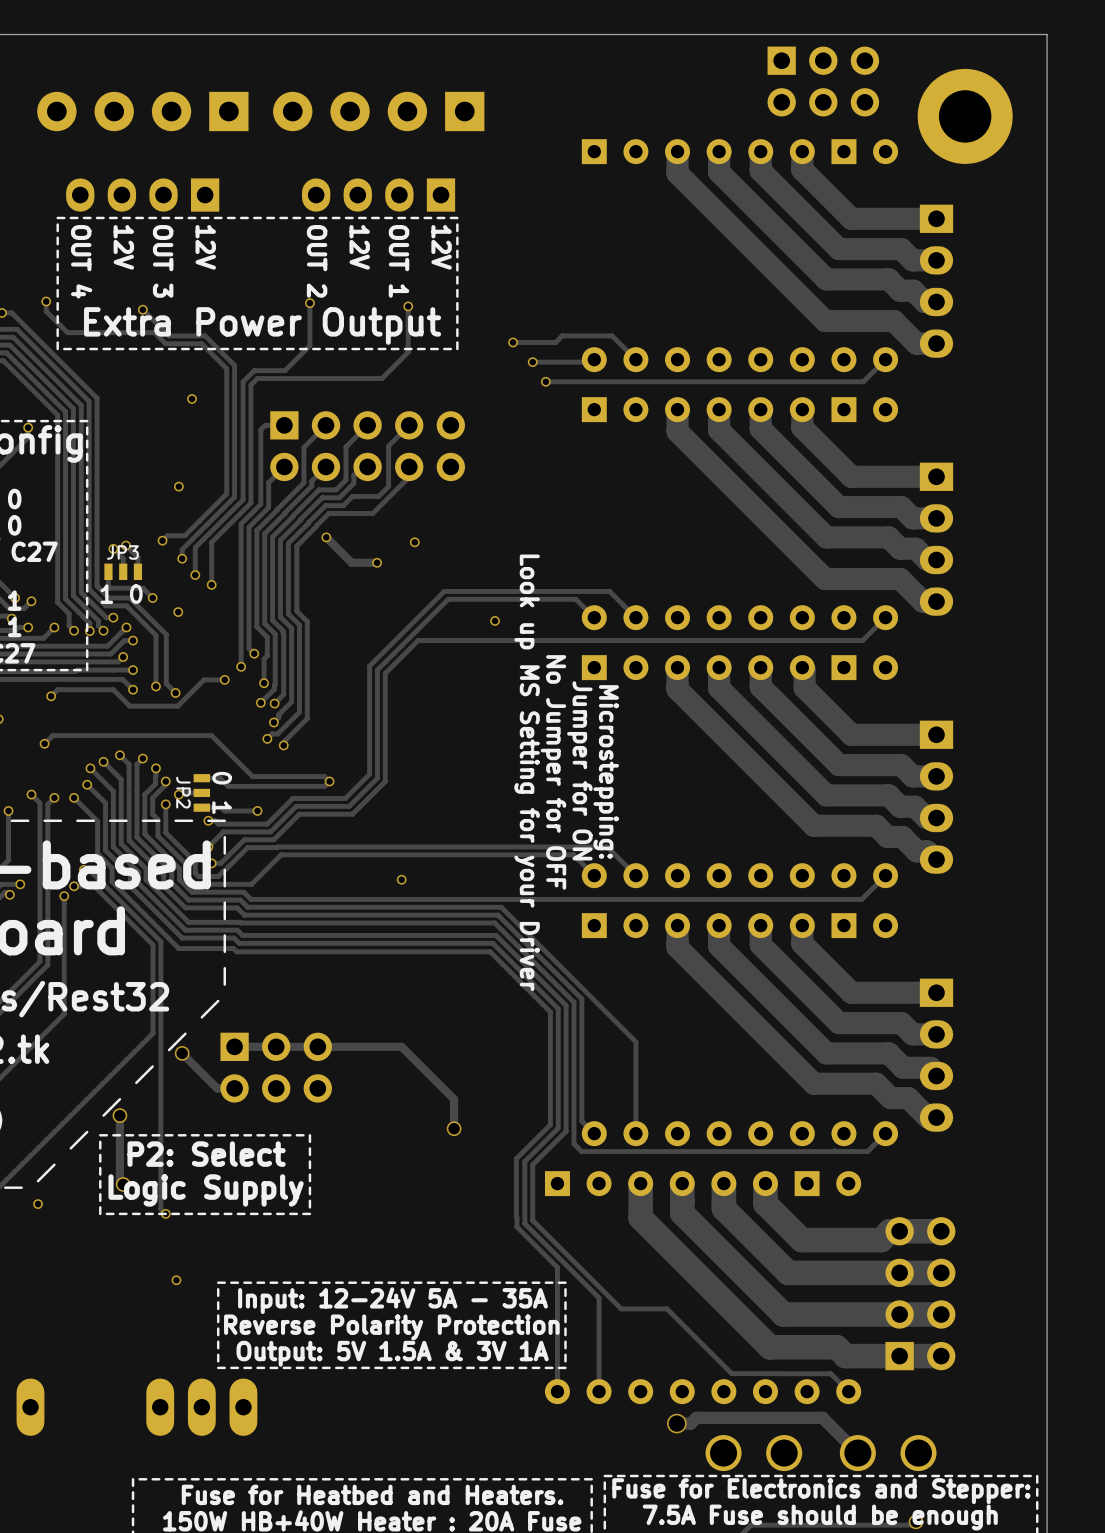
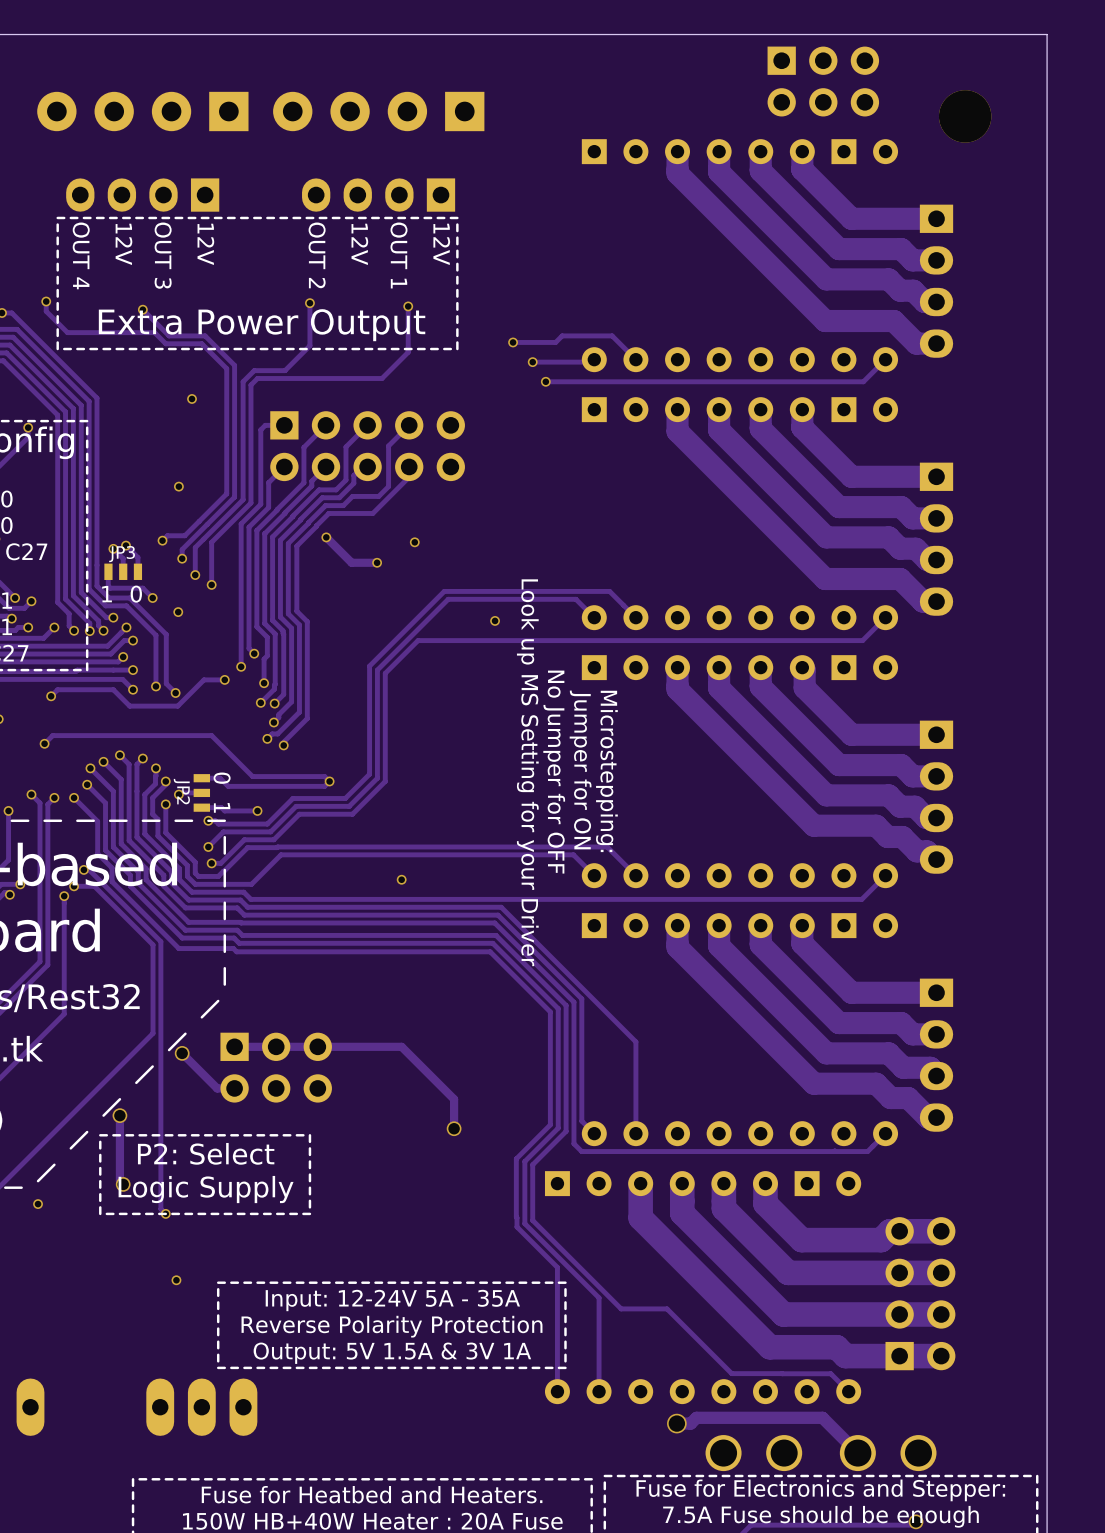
part footprint: [917, 68, 1013, 164] -> [938, 90, 992, 143]

